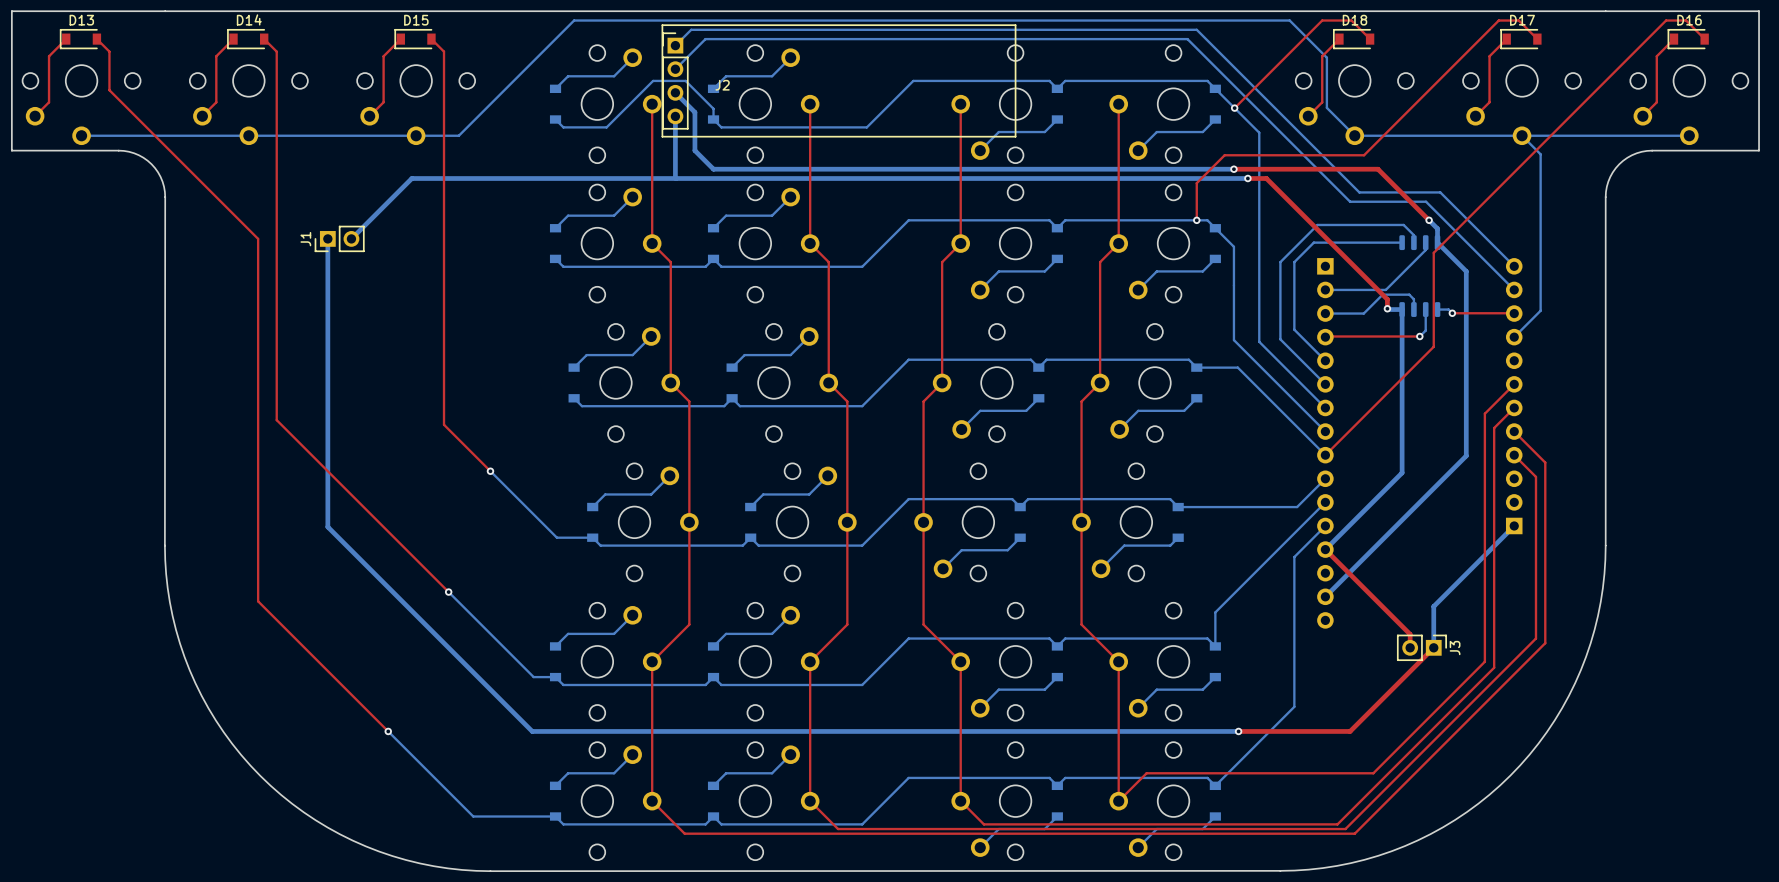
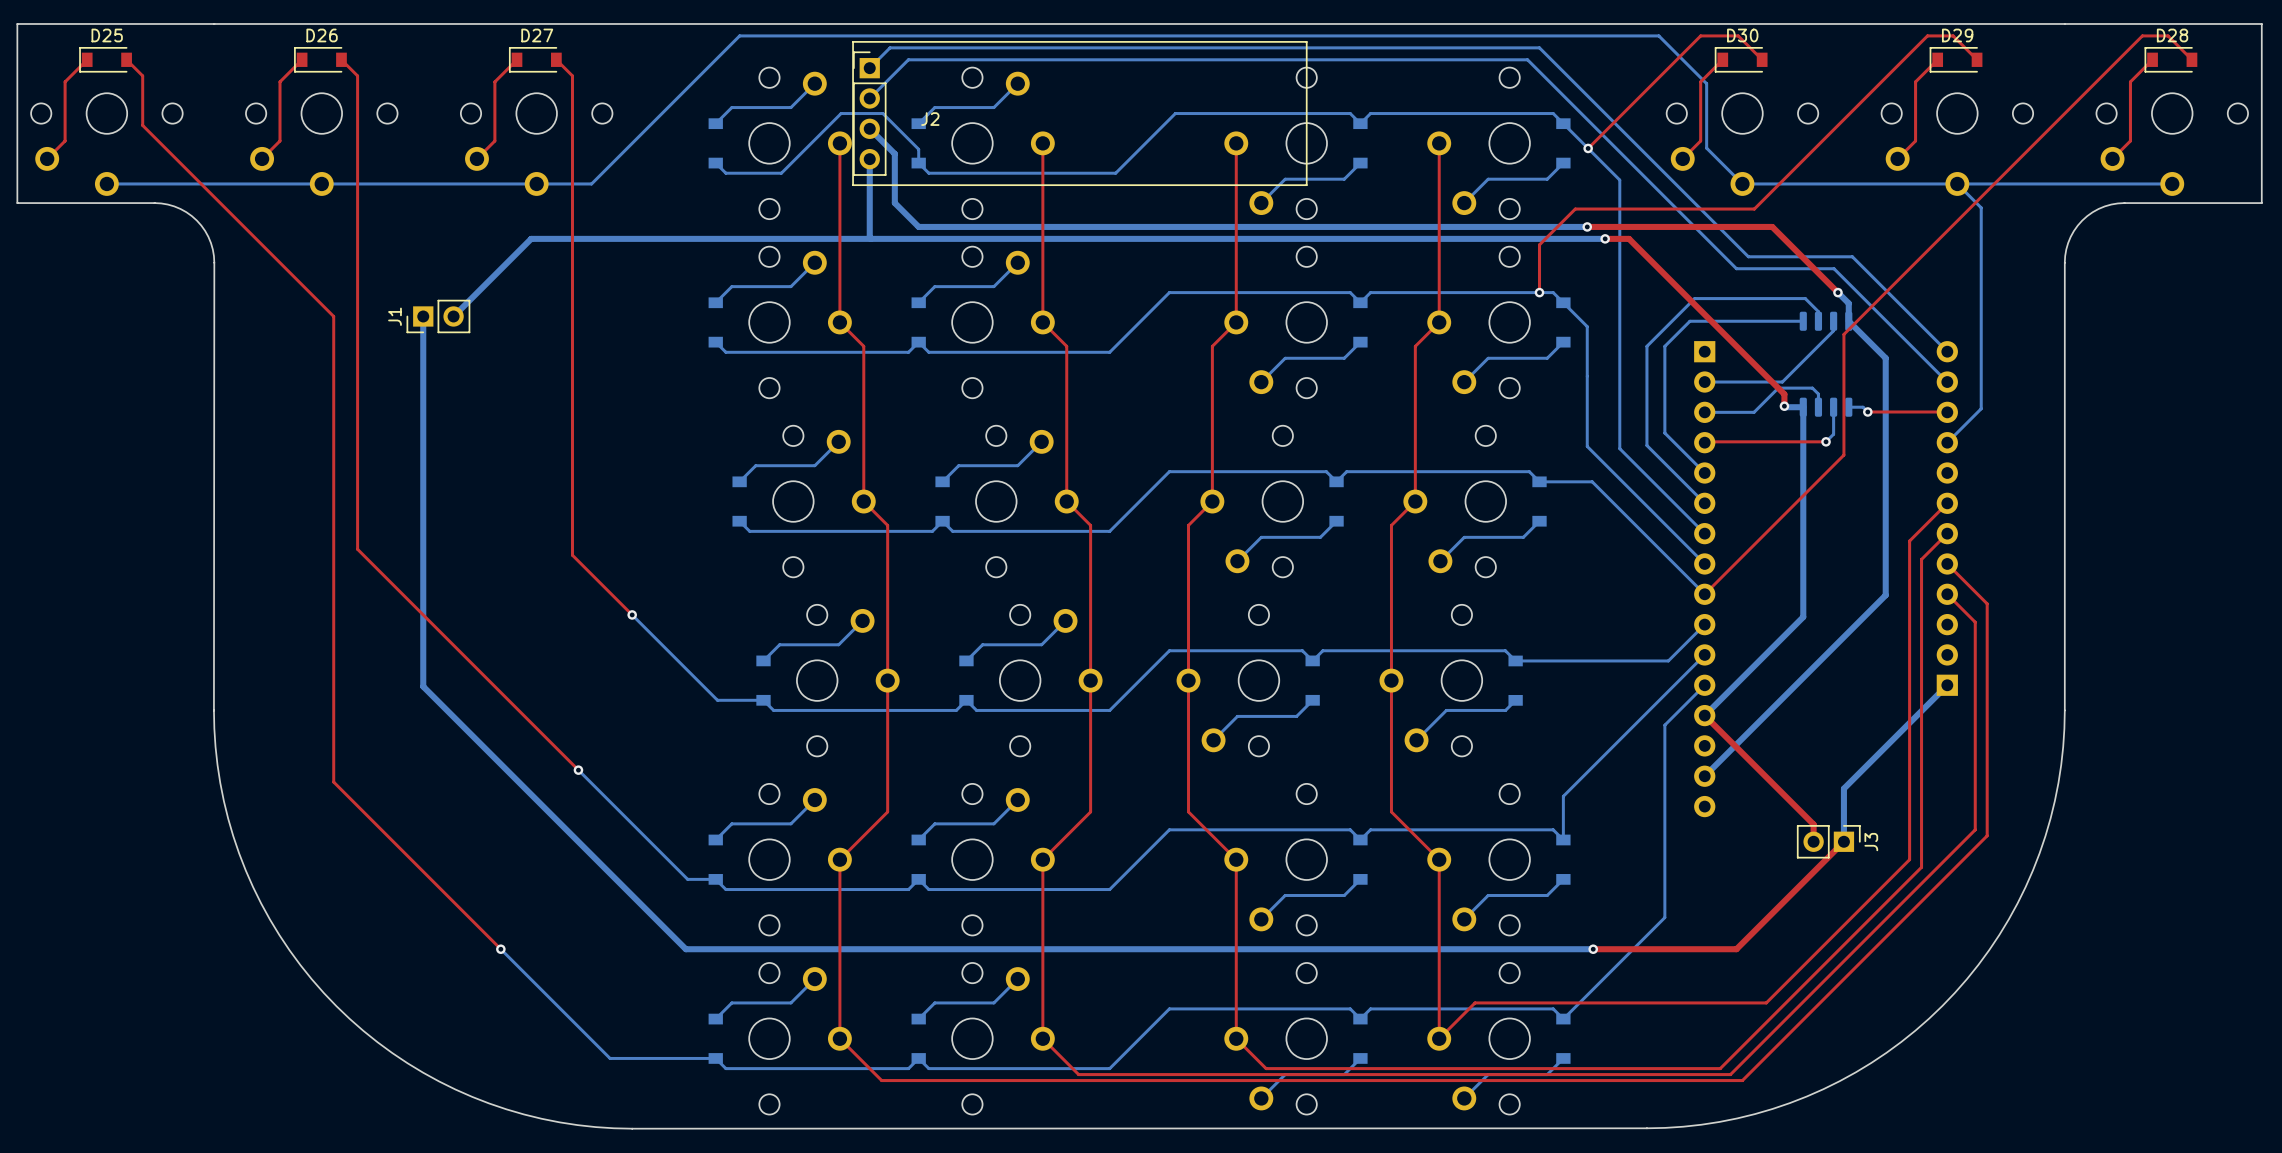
D14 name: D14 (249, 19) -> D26 (322, 35)
D13 name: D13 (81, 20) -> D25 (107, 35)
D15 name: D15 (416, 20) -> D27 (537, 35)
D18 name: D18 (1354, 20) -> D30 (1742, 35)
D17 name: D17 (1522, 20) -> D29 (1957, 35)
D16 name: D16 (1689, 20) -> D28 (2172, 35)

